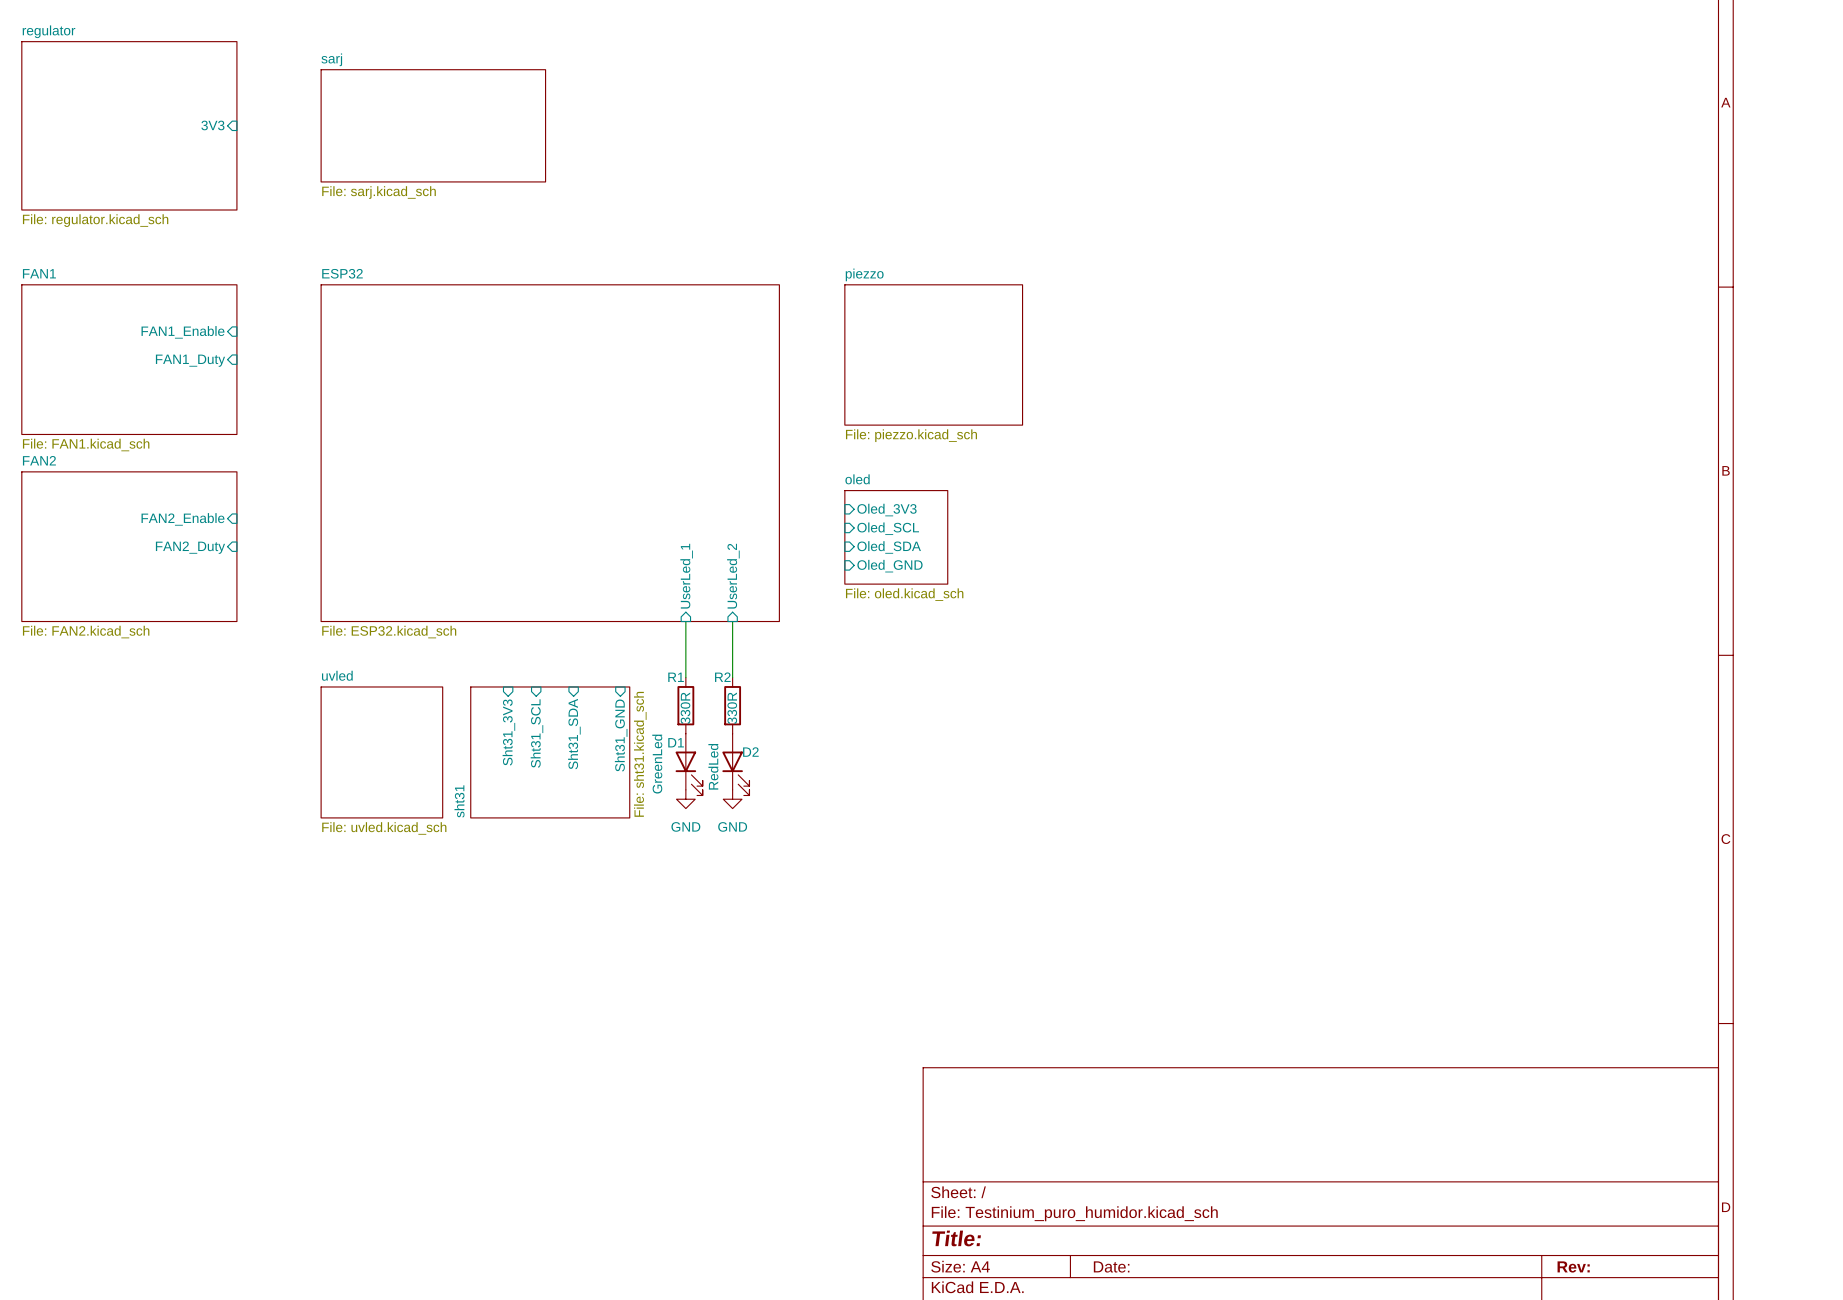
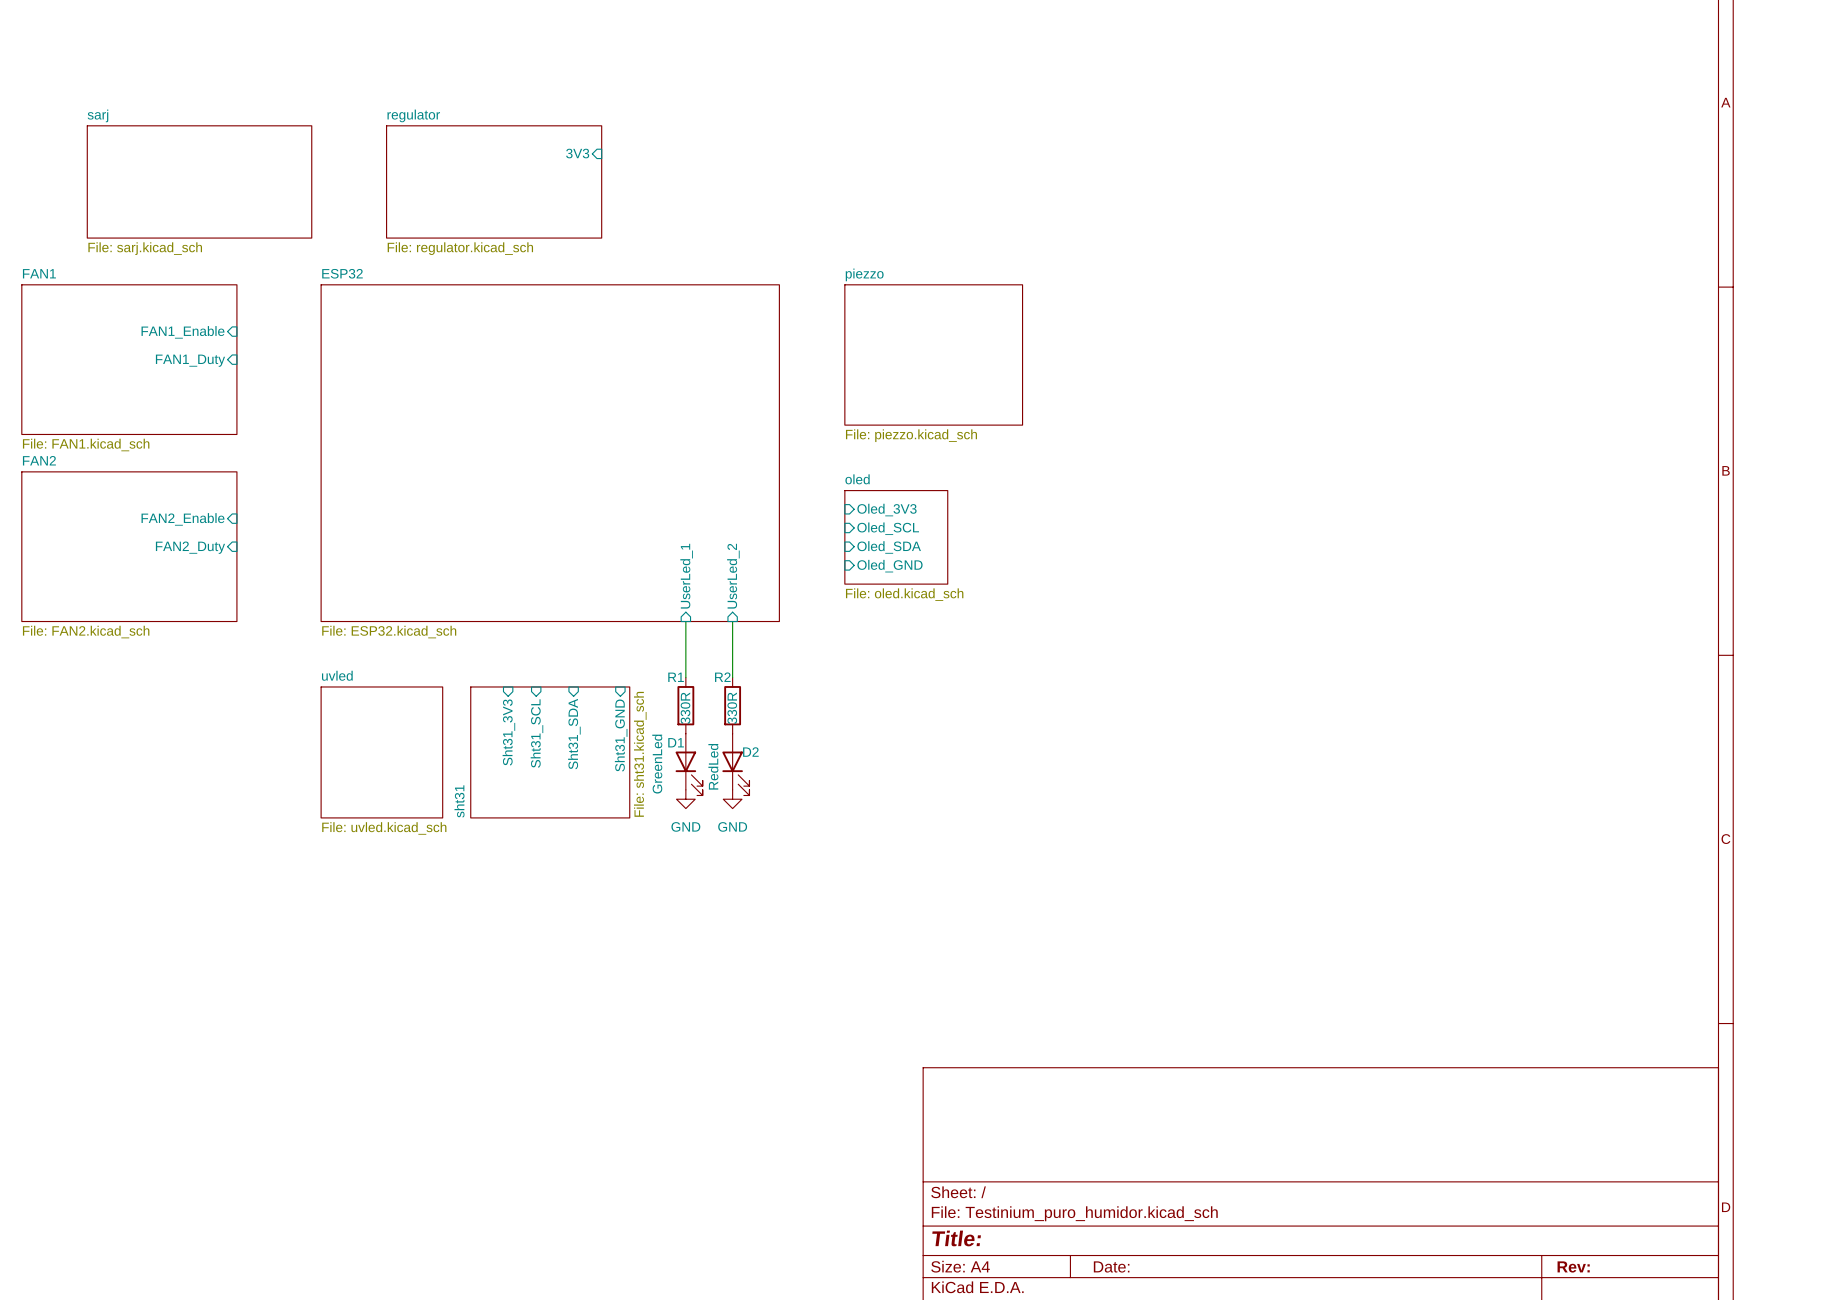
sheet regulator: File: regulator.kicad_sch (129, 125) -> none
sheet pin: 3V3 (212, 125) -> none
sheet sarj: File: sarj.kicad_sch (433, 125) -> none
sheet pin: none -> 3V3 (577, 153)
sheet sarj: none -> File: sarj.kicad_sch (199, 181)
sheet regulator: none -> File: regulator.kicad_sch (494, 181)

